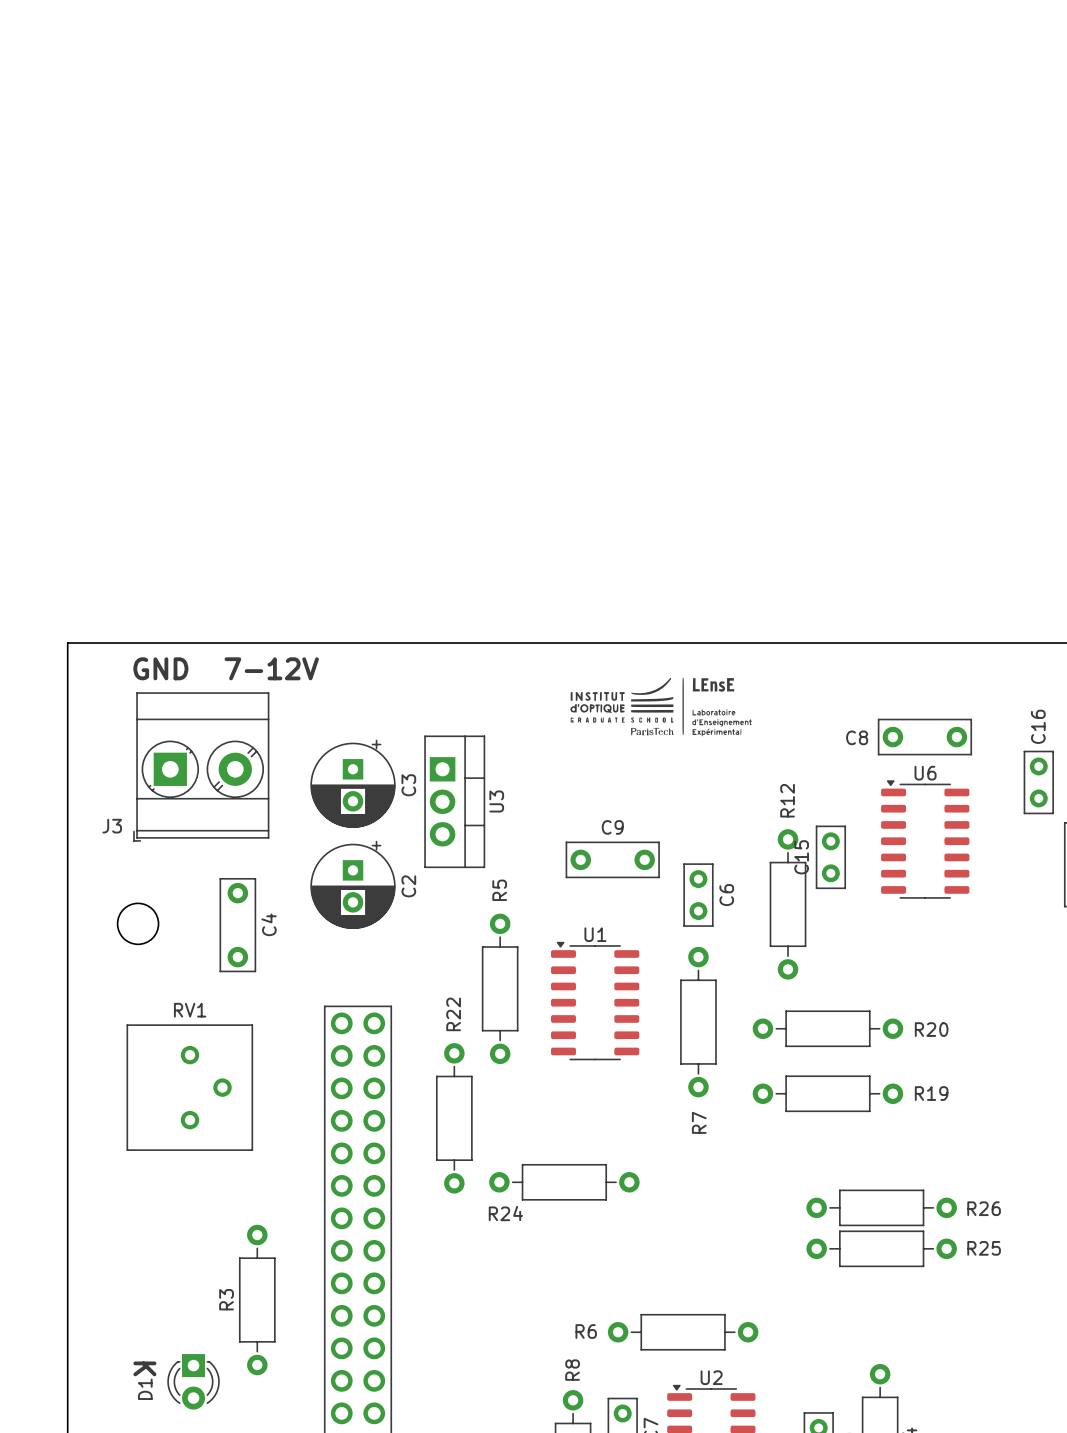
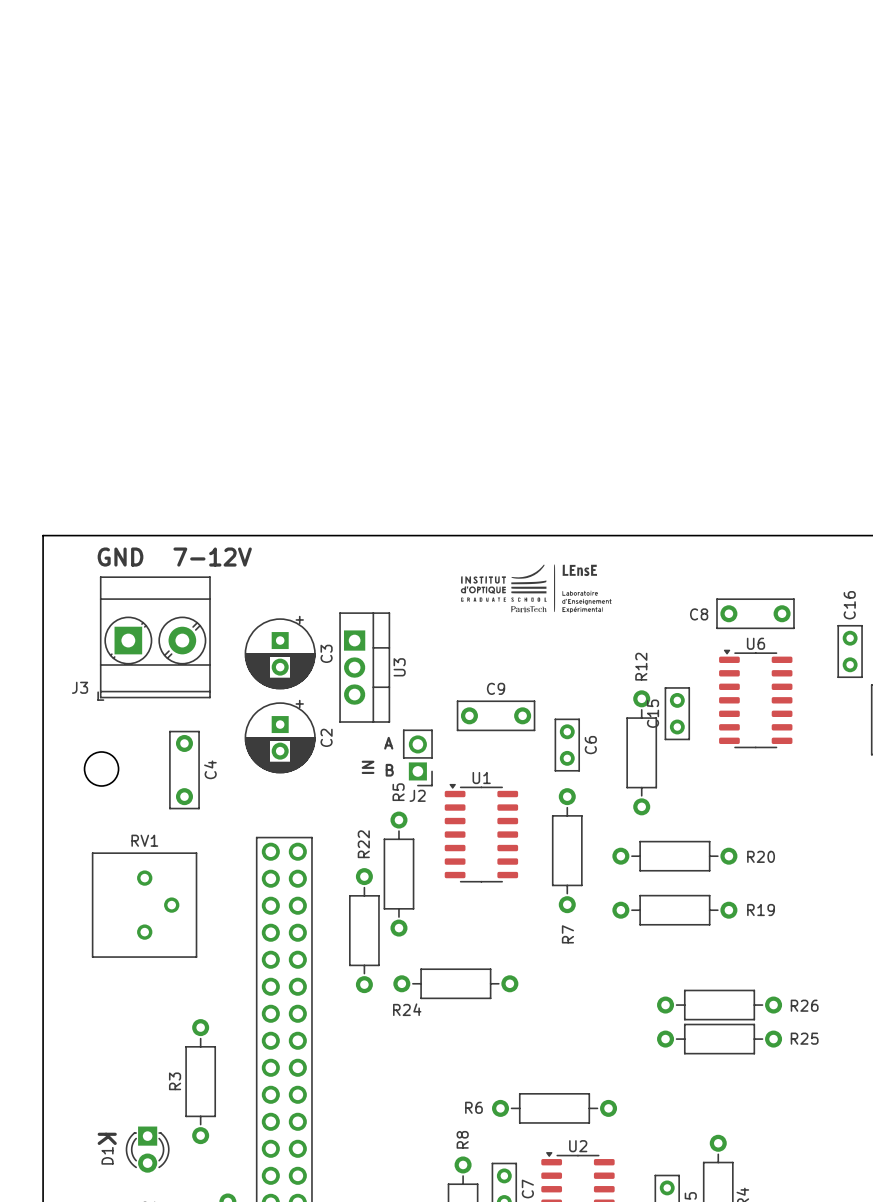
text: none -> A (388, 743)
J2: none -> (417, 757)
text: none -> IN (368, 767)
text: none -> B (389, 770)
R5 position: (500, 988) -> (398, 874)

